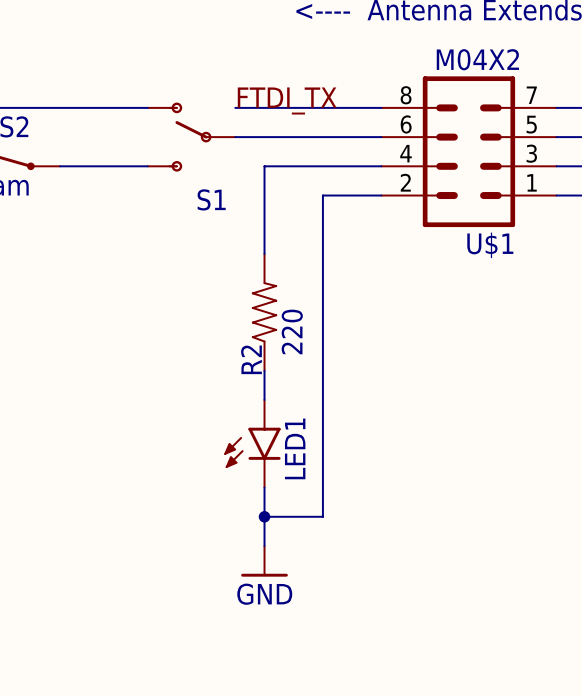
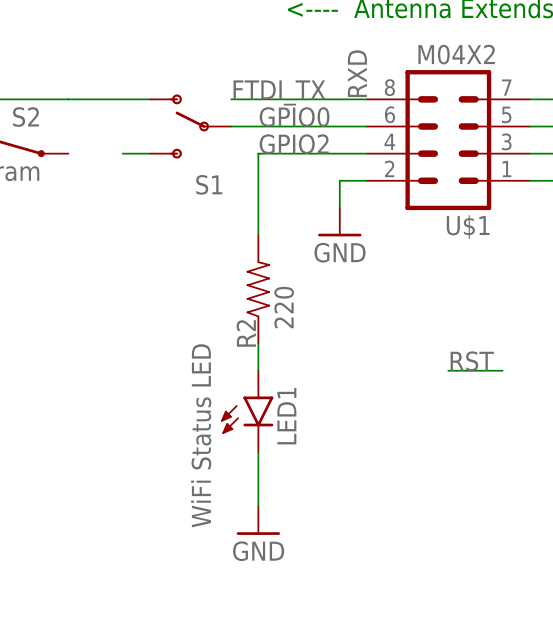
text: none -> RXD (357, 73)
label: none -> GPIO0 (294, 117)
label: none -> GPIO2 (294, 144)
wire: (60, 166) (118, 166) -> none
wire: (352, 195) (322, 195) (322, 516) (264, 516) -> (339, 180) (339, 207)
power symbol: none -> GND (339, 222)
label: none -> RST (472, 361)
wire: none -> (448, 370) (502, 370)
LED1 value: none -> WiFi Status LED (201, 435)
junction: (264, 516) -> none

